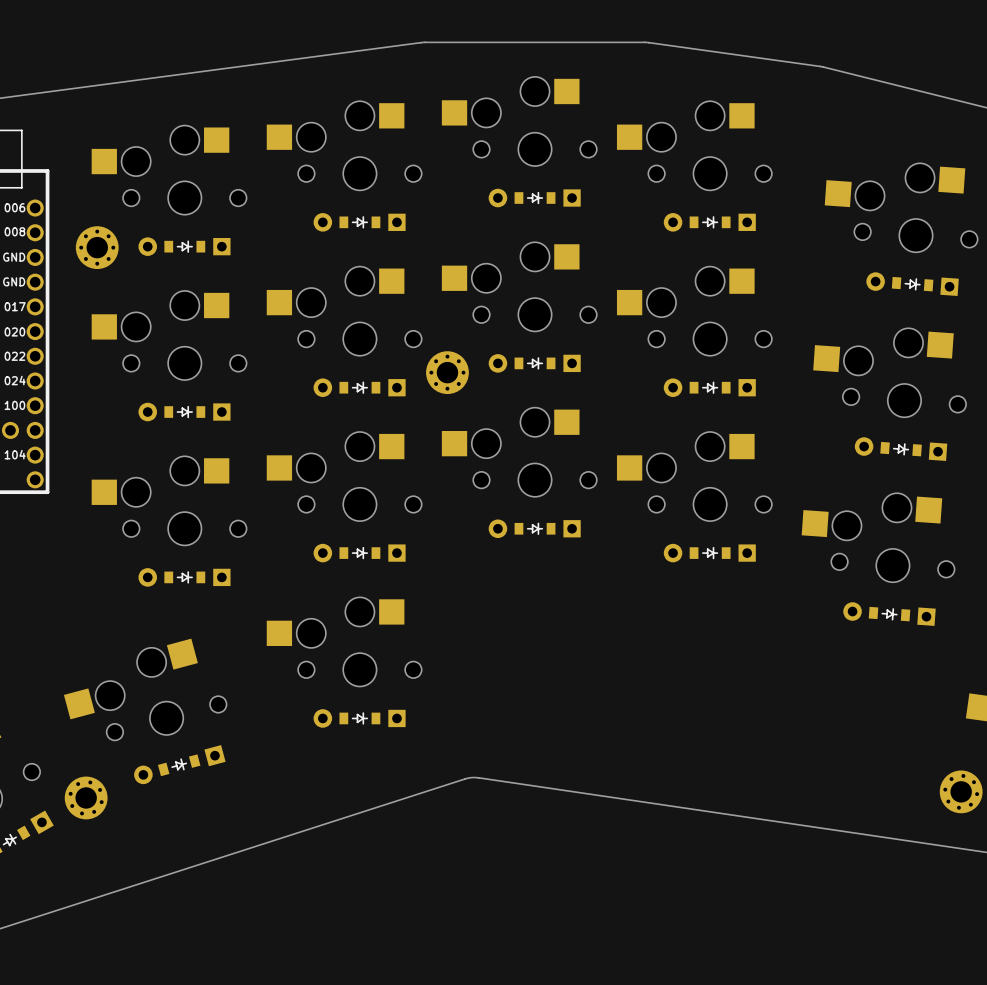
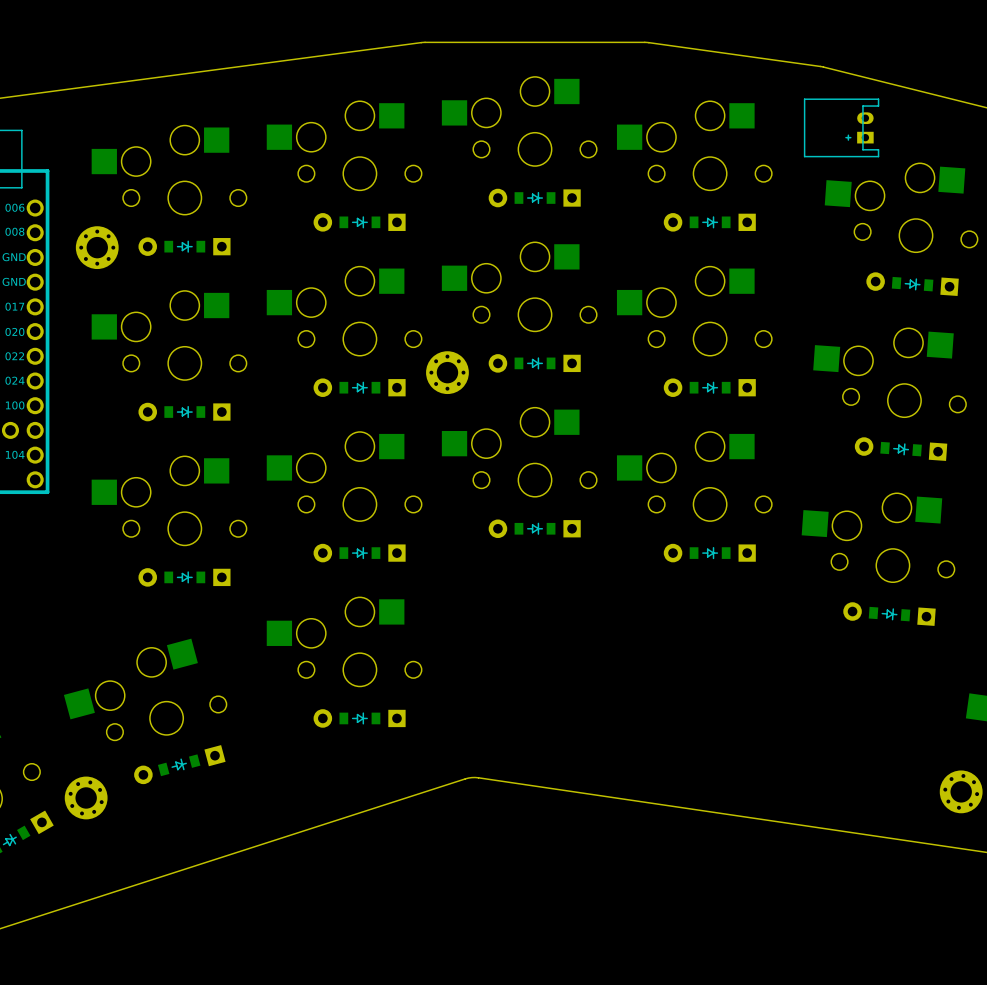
part: none -> (841, 127)

